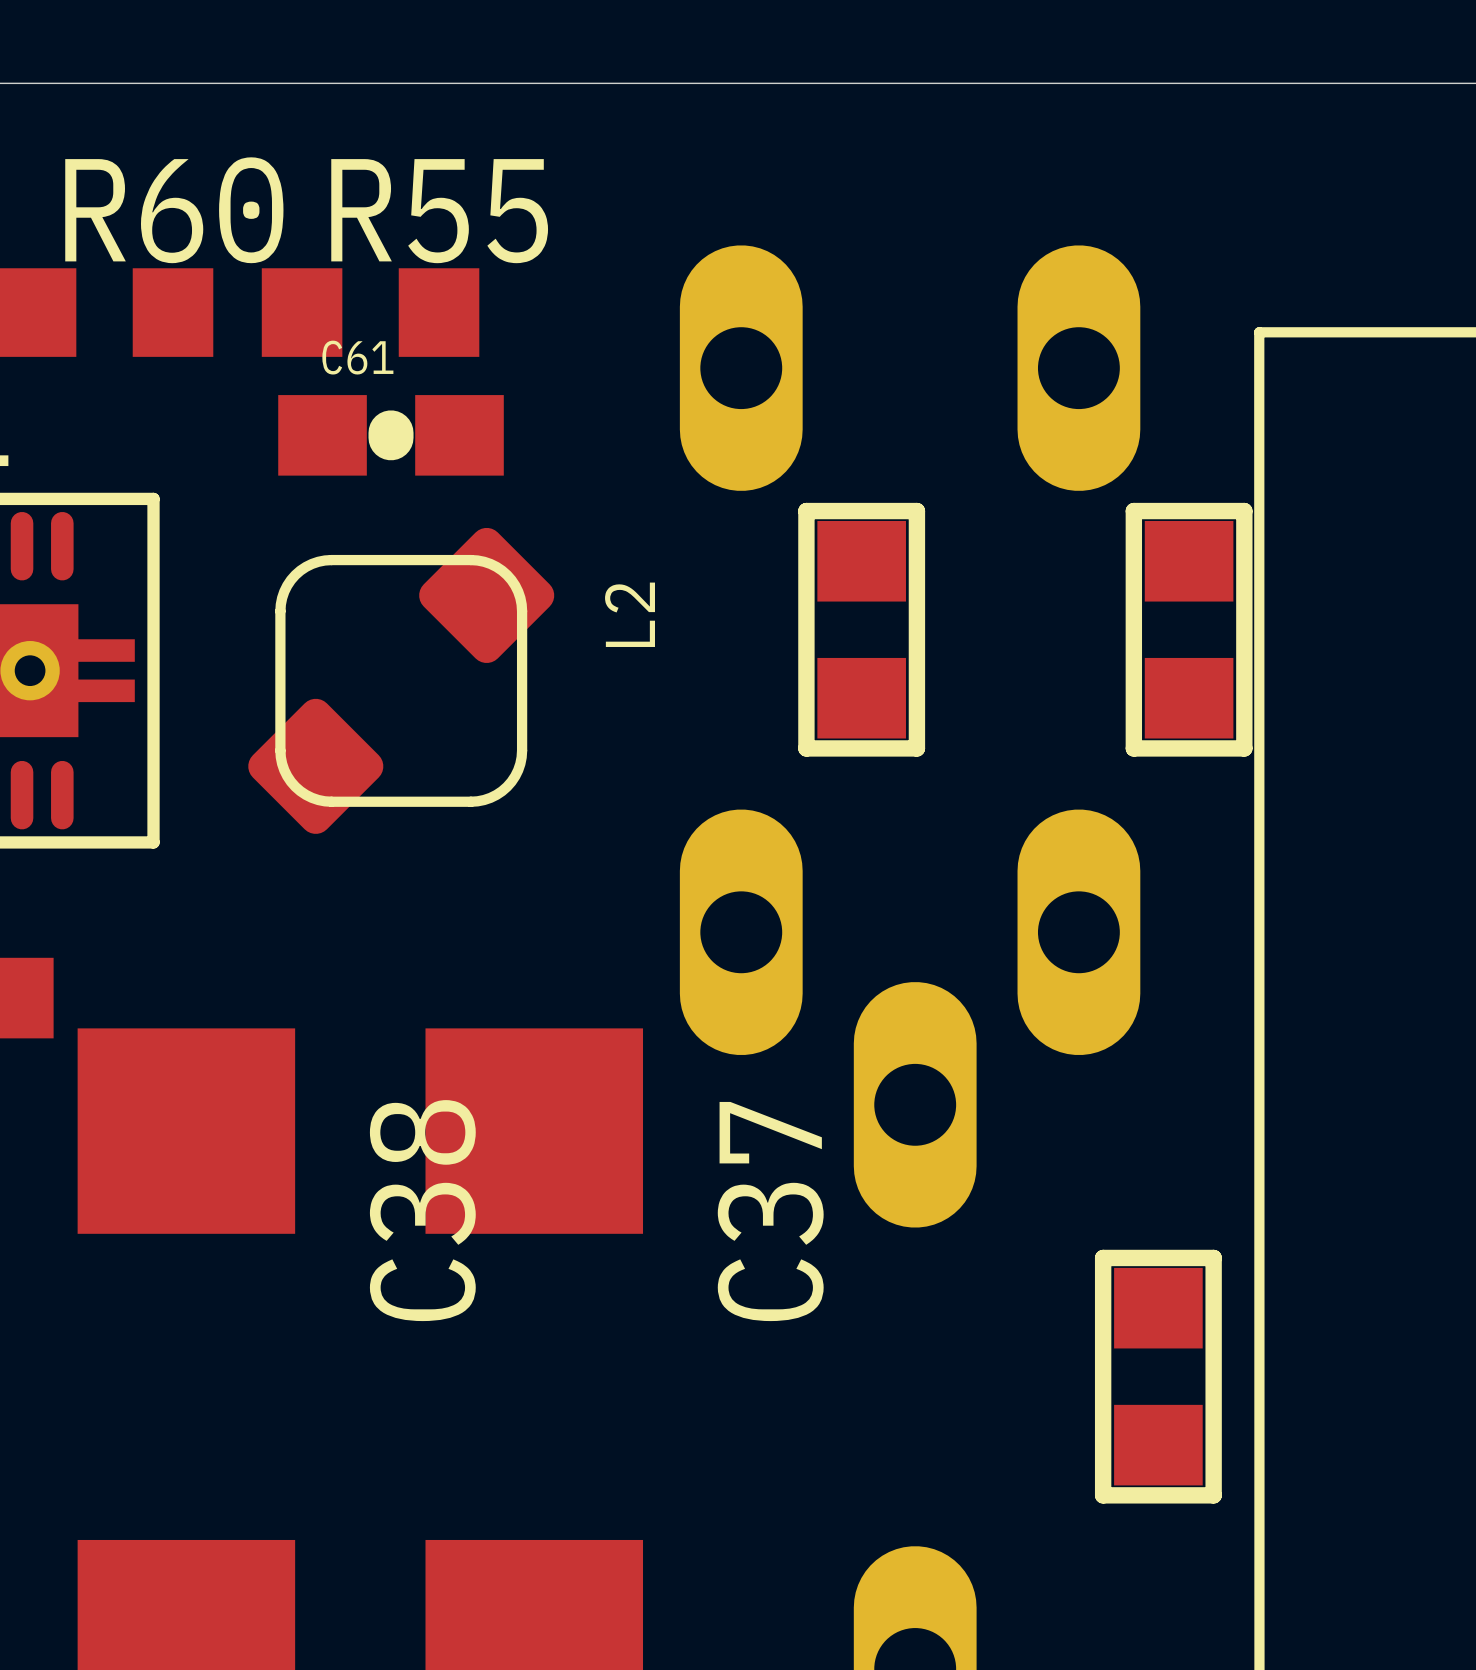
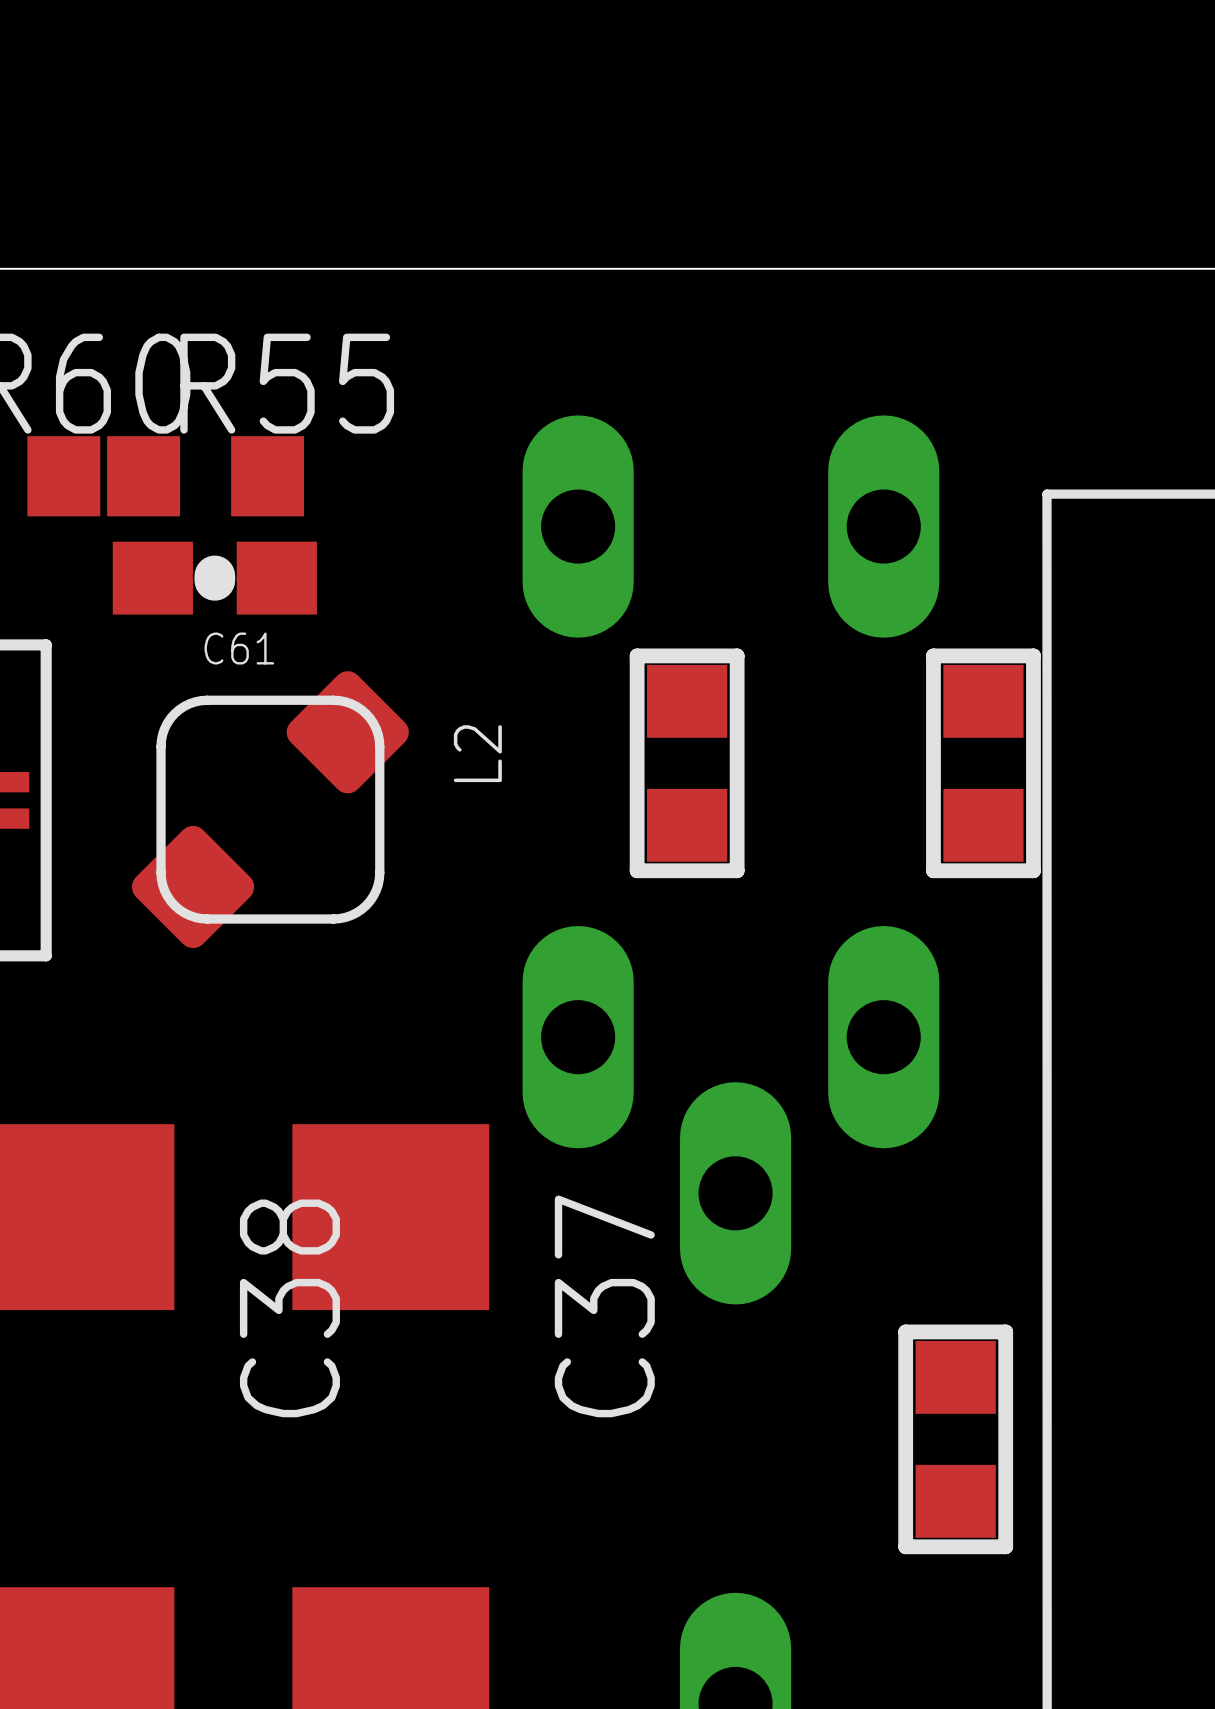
R55 position: (370, 312) -> (205, 476)
C61 name position: C61 (357, 357) -> C61 (239, 648)
C61 position: (391, 435) -> (214, 578)

